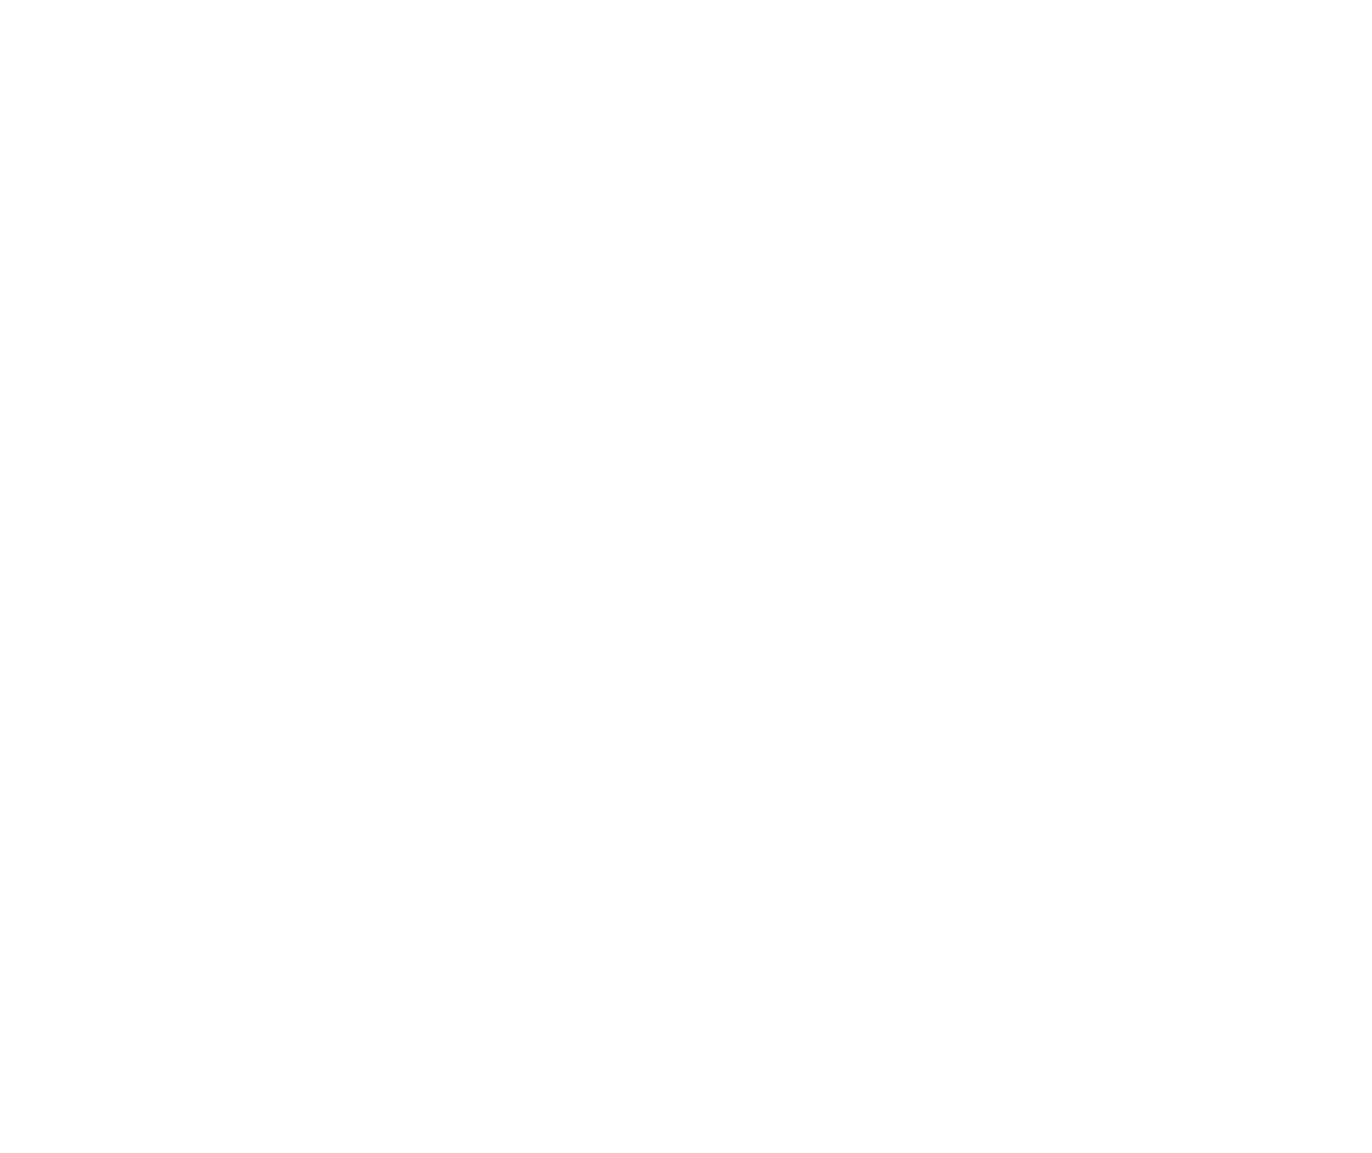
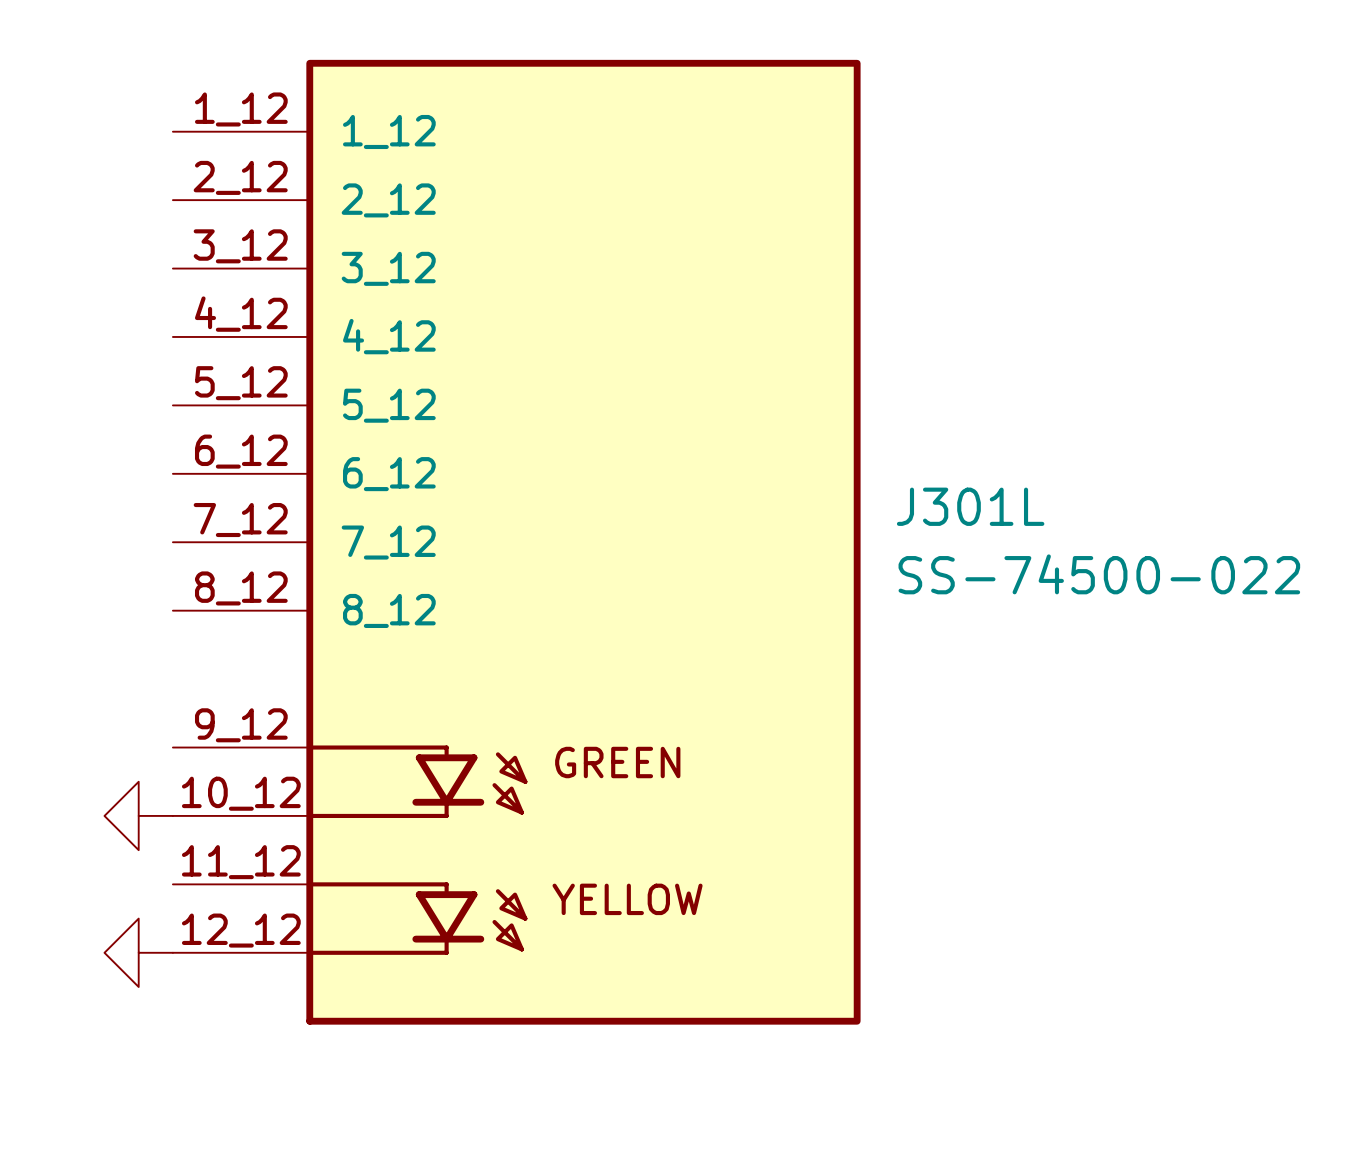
J301L: none -> SS-74500-022 (516, 542)
power symbol: none -> (138, 815)
power symbol: none -> (138, 952)

